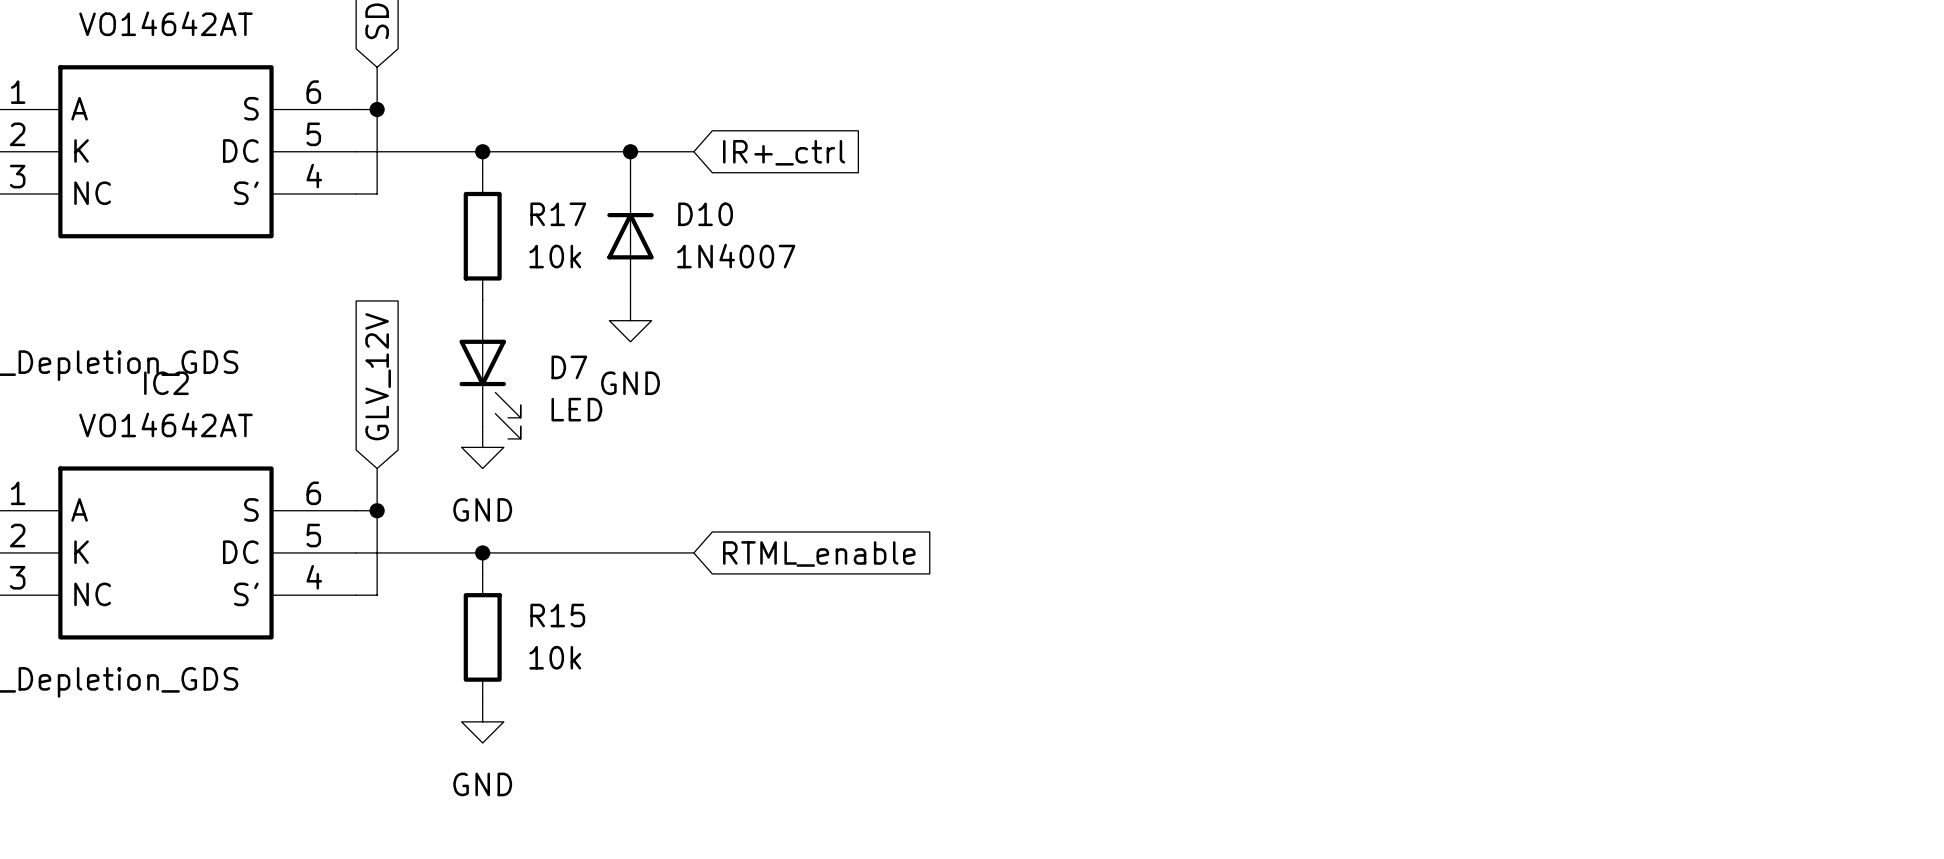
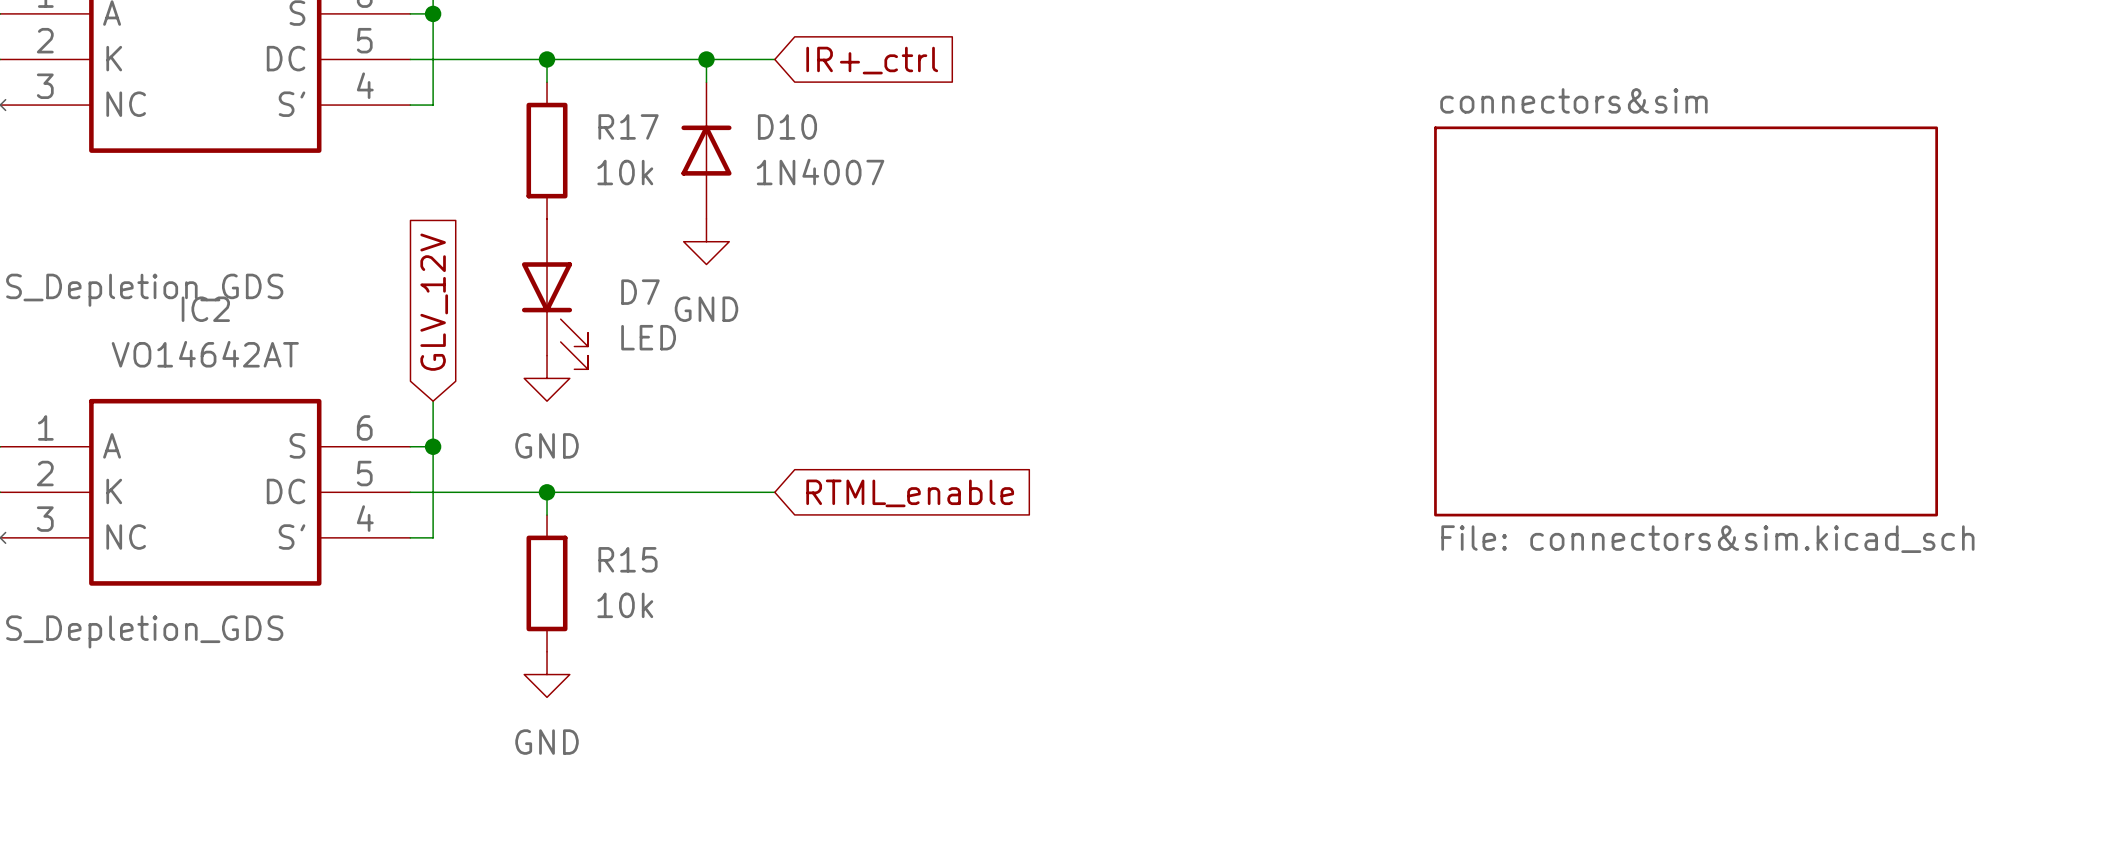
sheet connectors&sim: none -> File: connectors&sim.kicad_sch (1686, 321)

